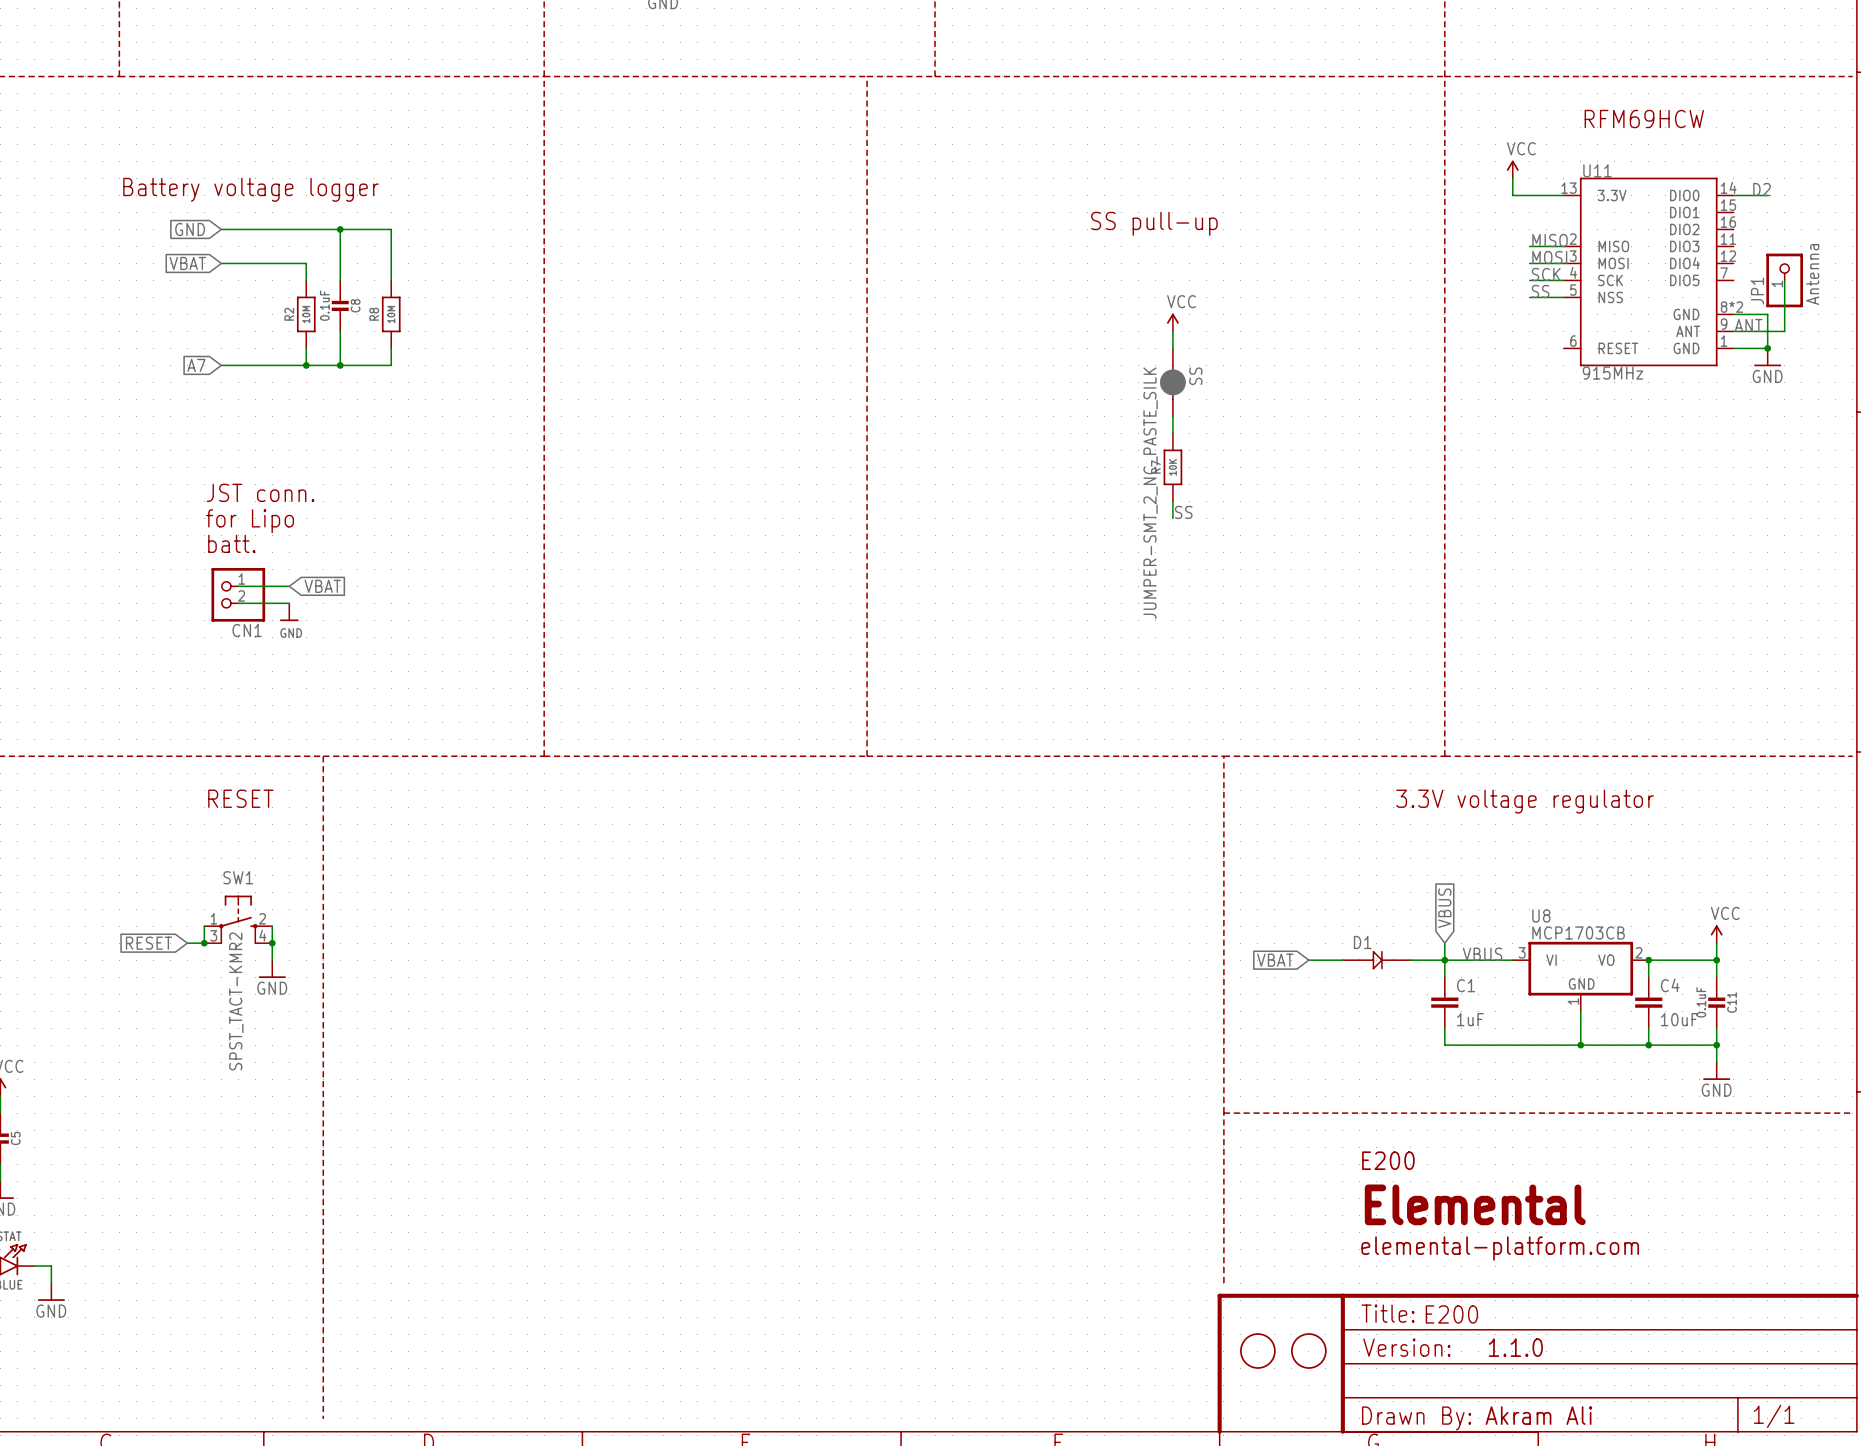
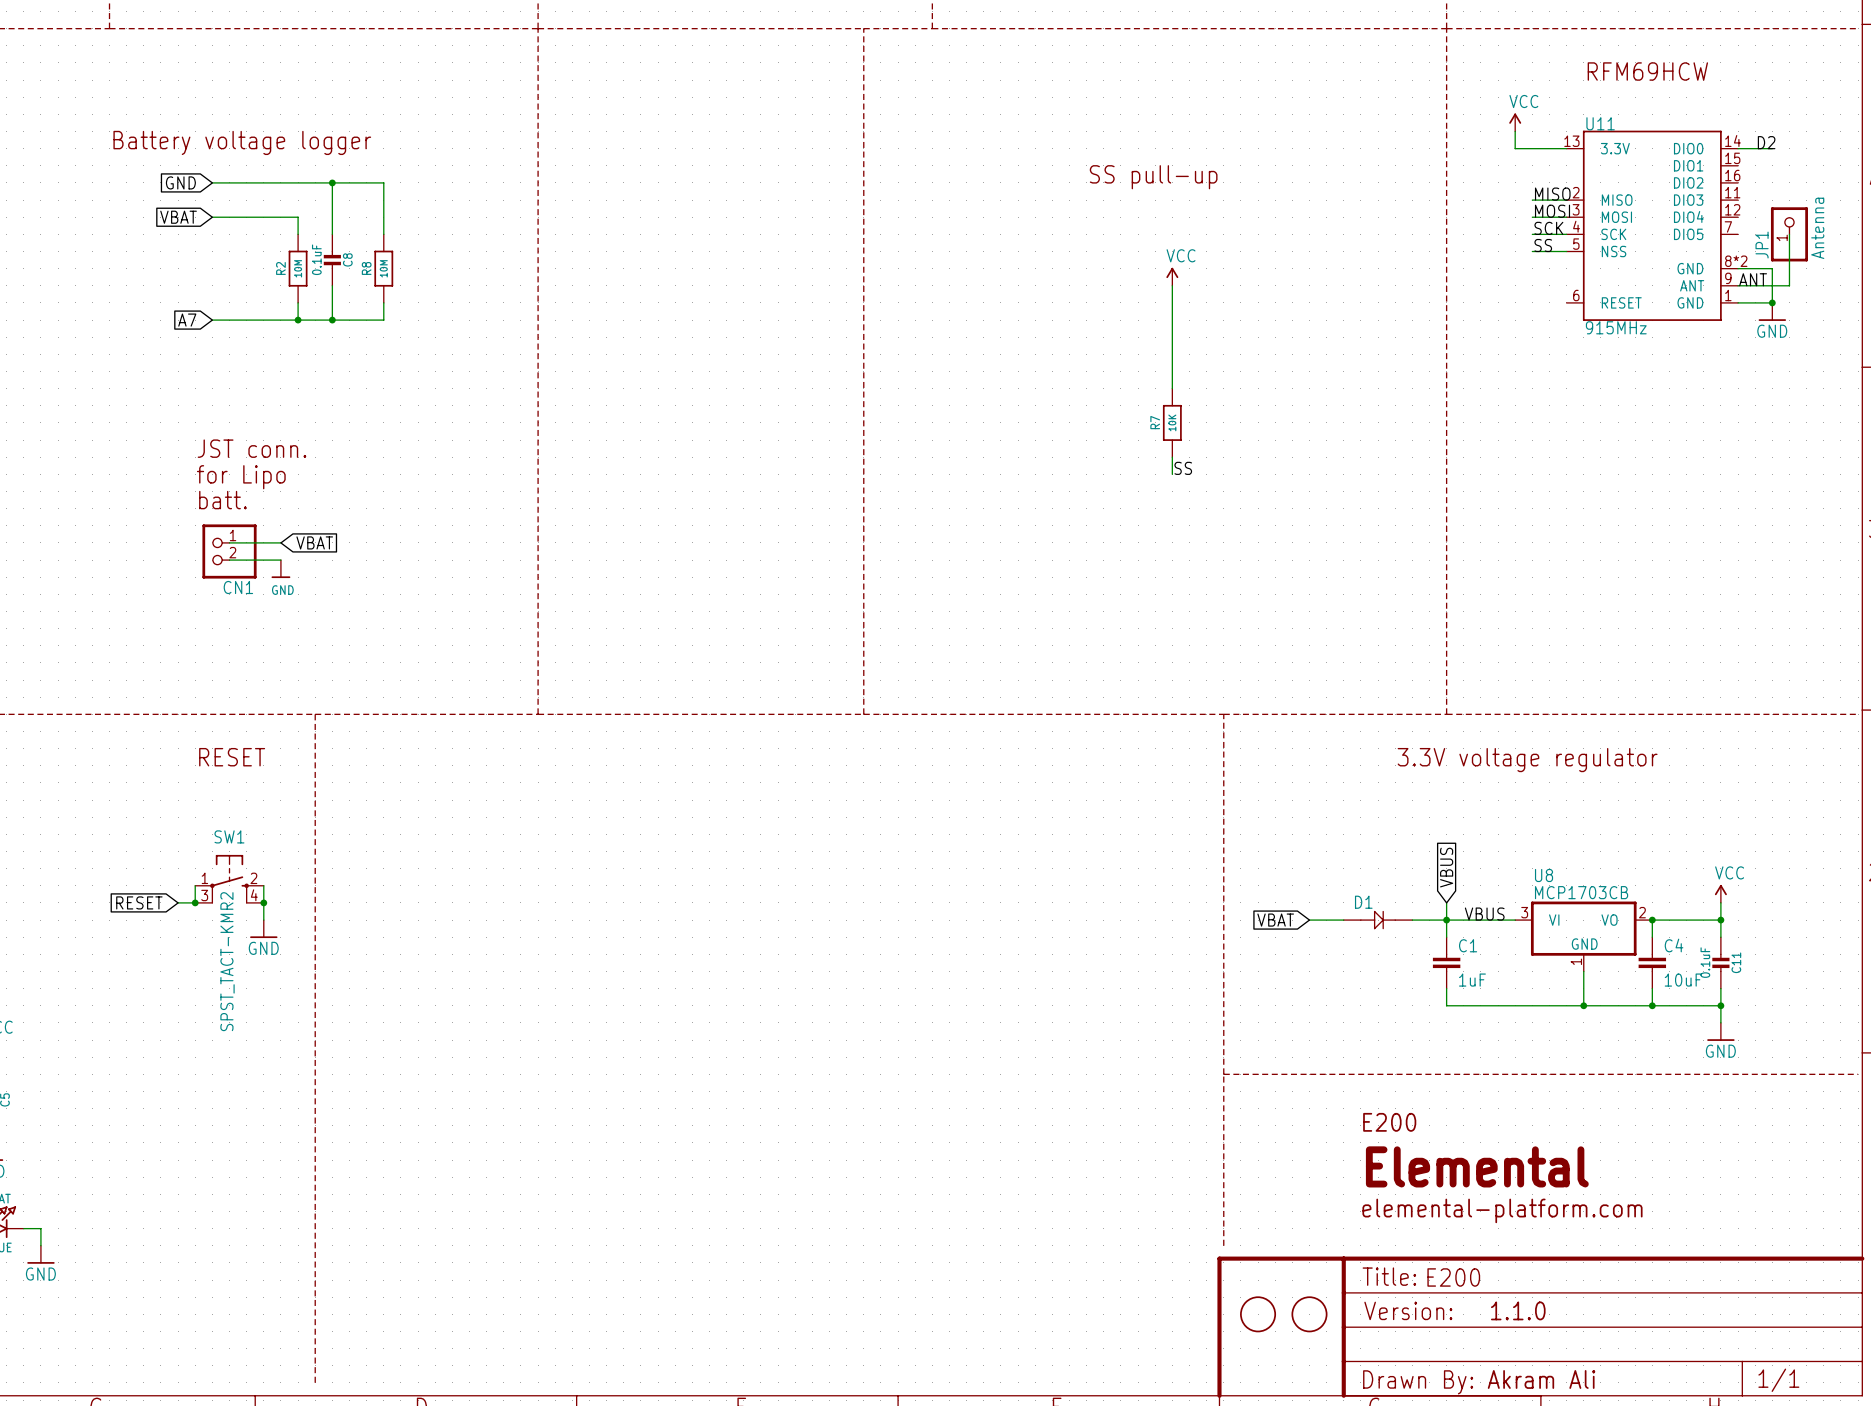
SS: JUMPER-SMT_2_NC_PASTE_SILK (1172, 382) -> none

